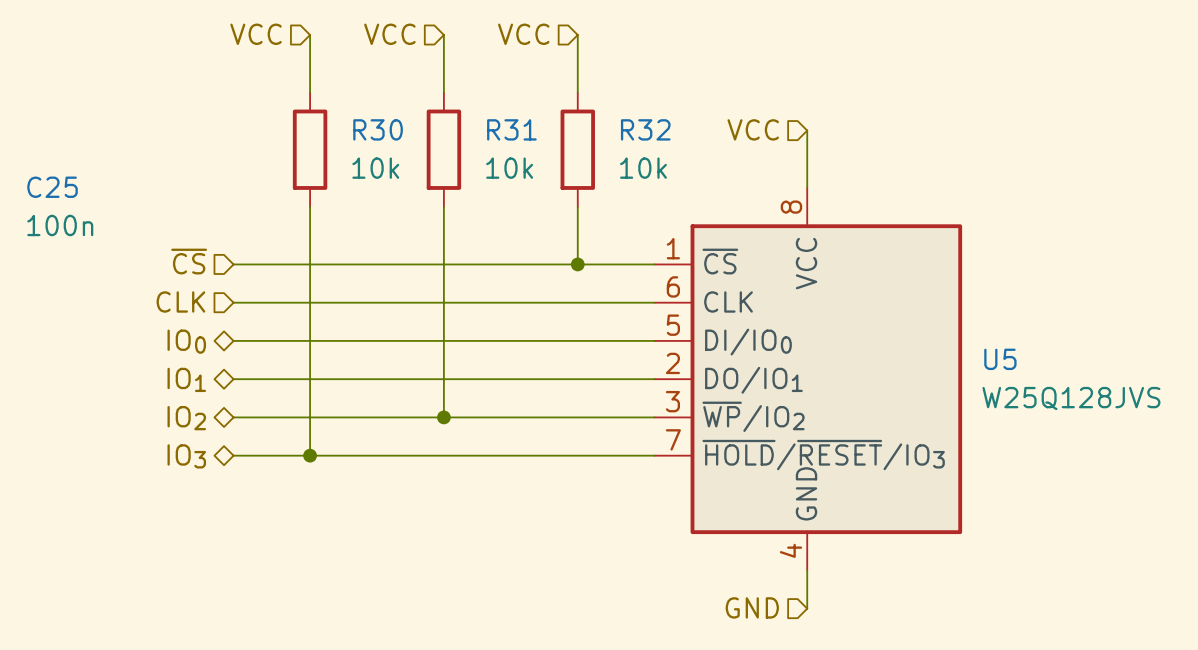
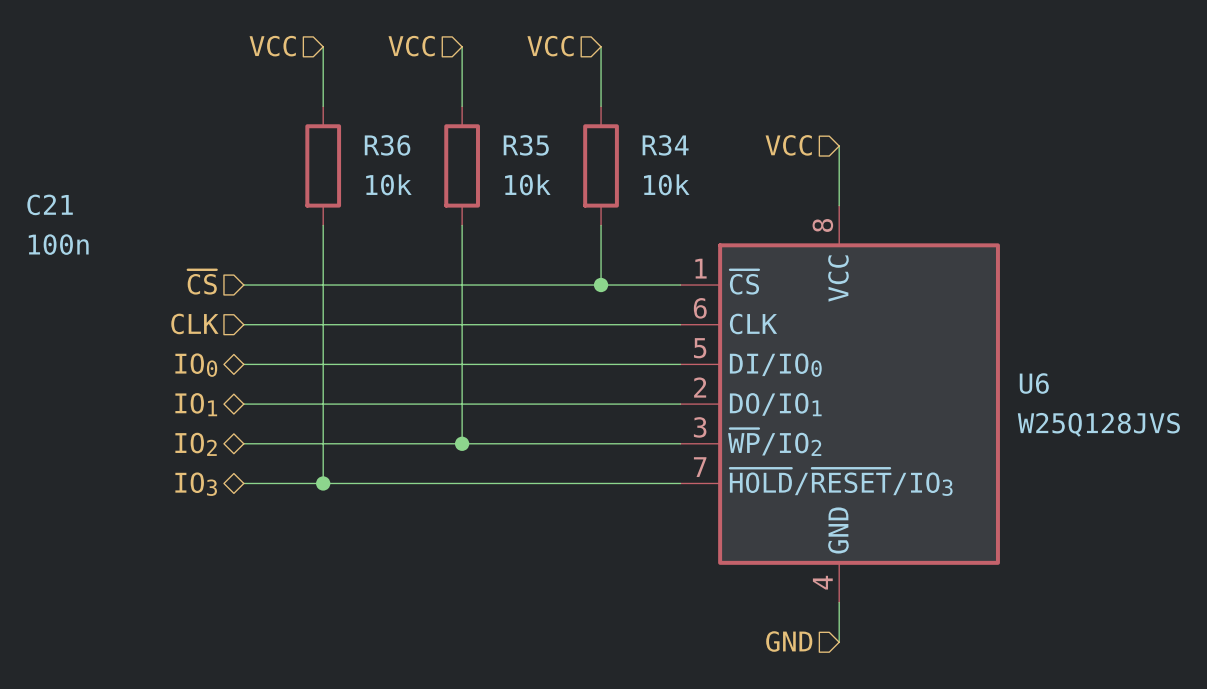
R30 name: R30 (378, 129) -> R36 (387, 145)
R31 name: R31 (511, 129) -> R35 (526, 145)
R32 name: R32 (645, 129) -> R34 (665, 145)
C25 name: C25 (52, 187) -> C21 (50, 204)
U5 name: U5 (1000, 359) -> U6 (1034, 383)

